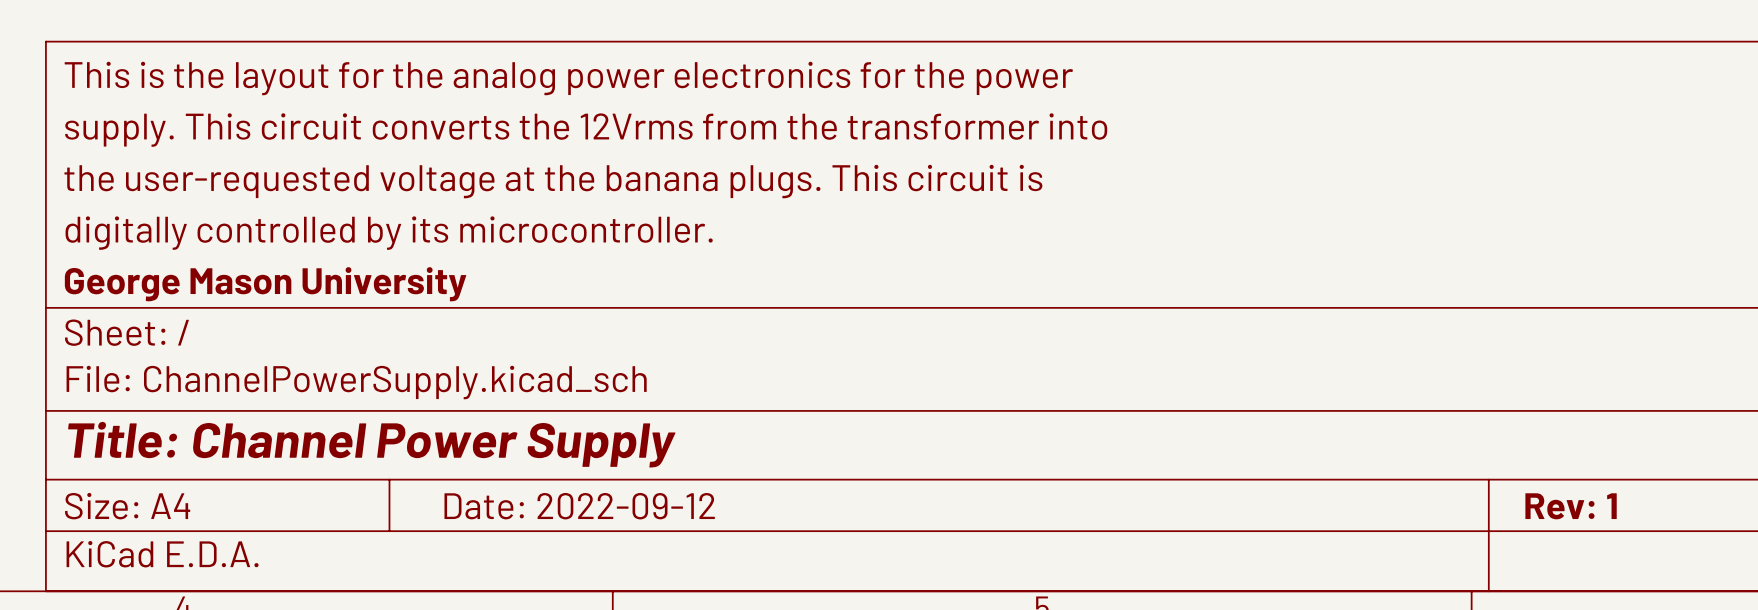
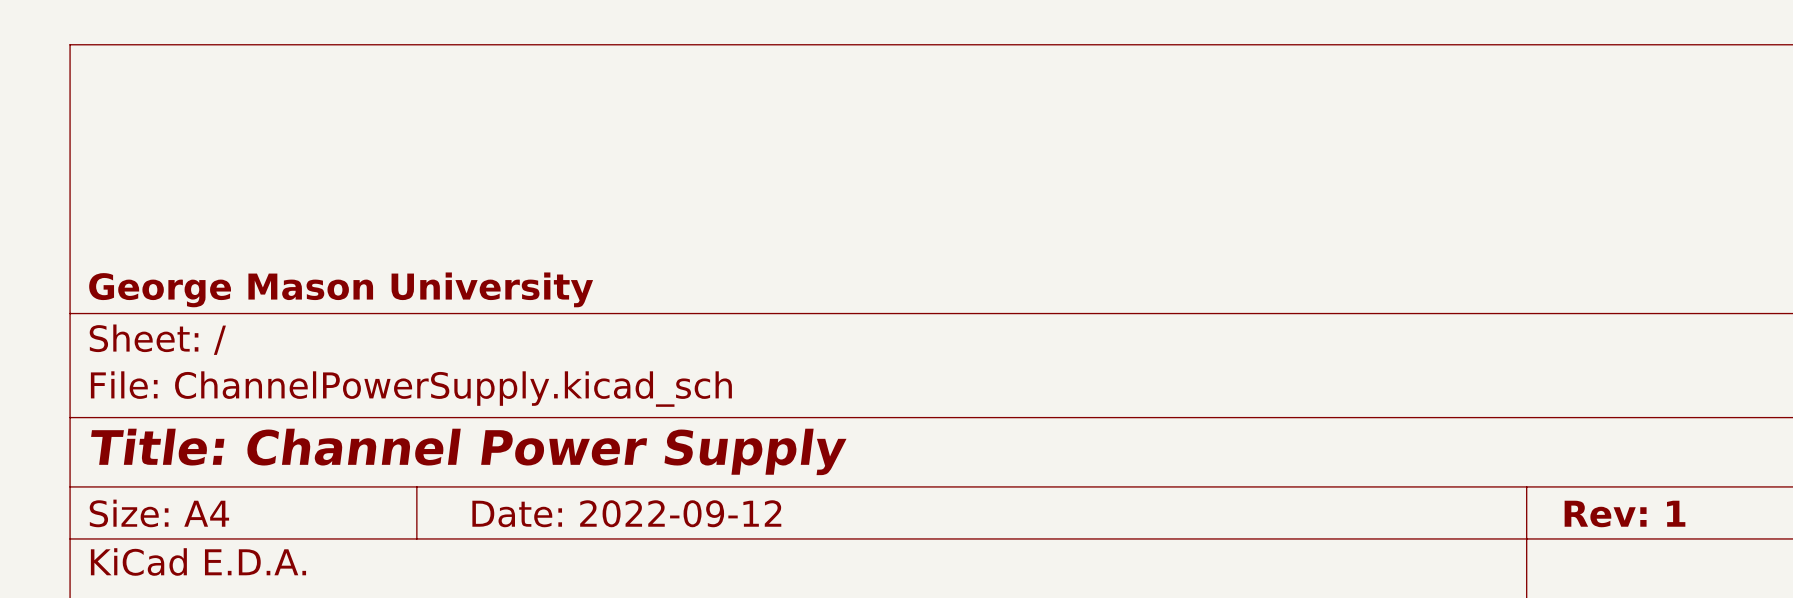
title block: This is the layout for the analog power electronics for the power (568, 78) -> none
title block: supply. This circuit converts the 12Vrms from the transformer into (586, 130) -> none
title block: the user-requested voltage at the banana plugs. This circuit is (553, 181) -> none
title block: digitally controlled by its microcontroller. (389, 233) -> none

